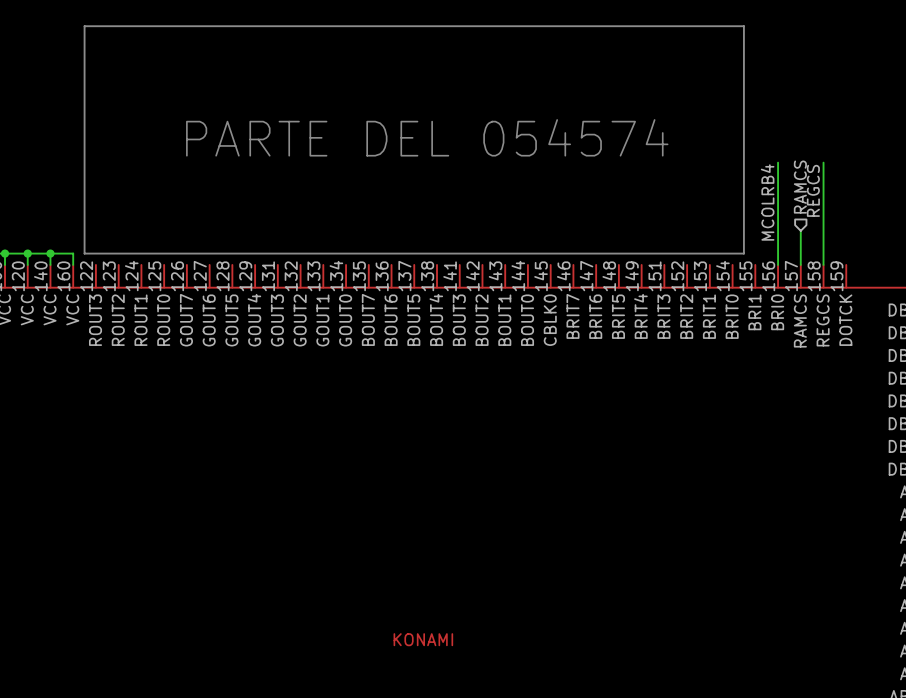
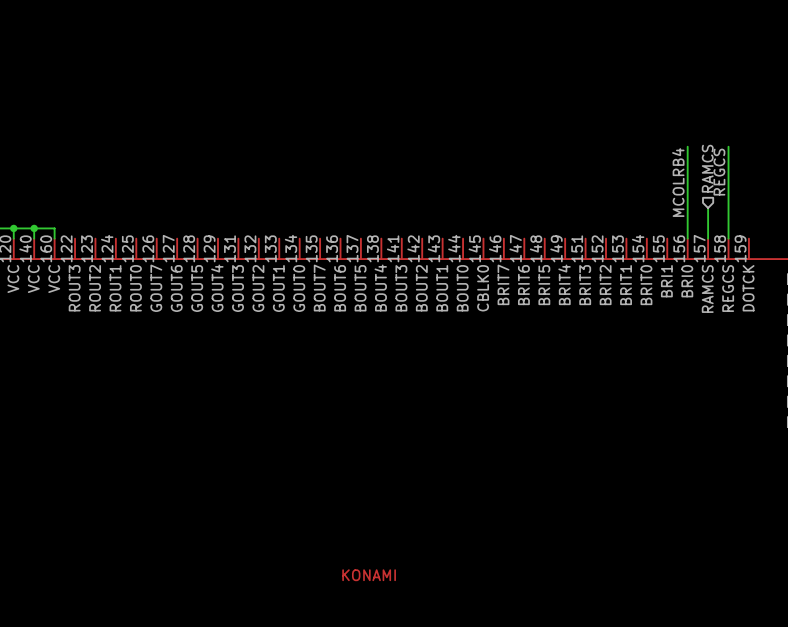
line: (84, 26) (743, 26) (743, 253) (84, 253) (84, 26) -> none
text: PARTE DEL 054574 (427, 137) -> none

